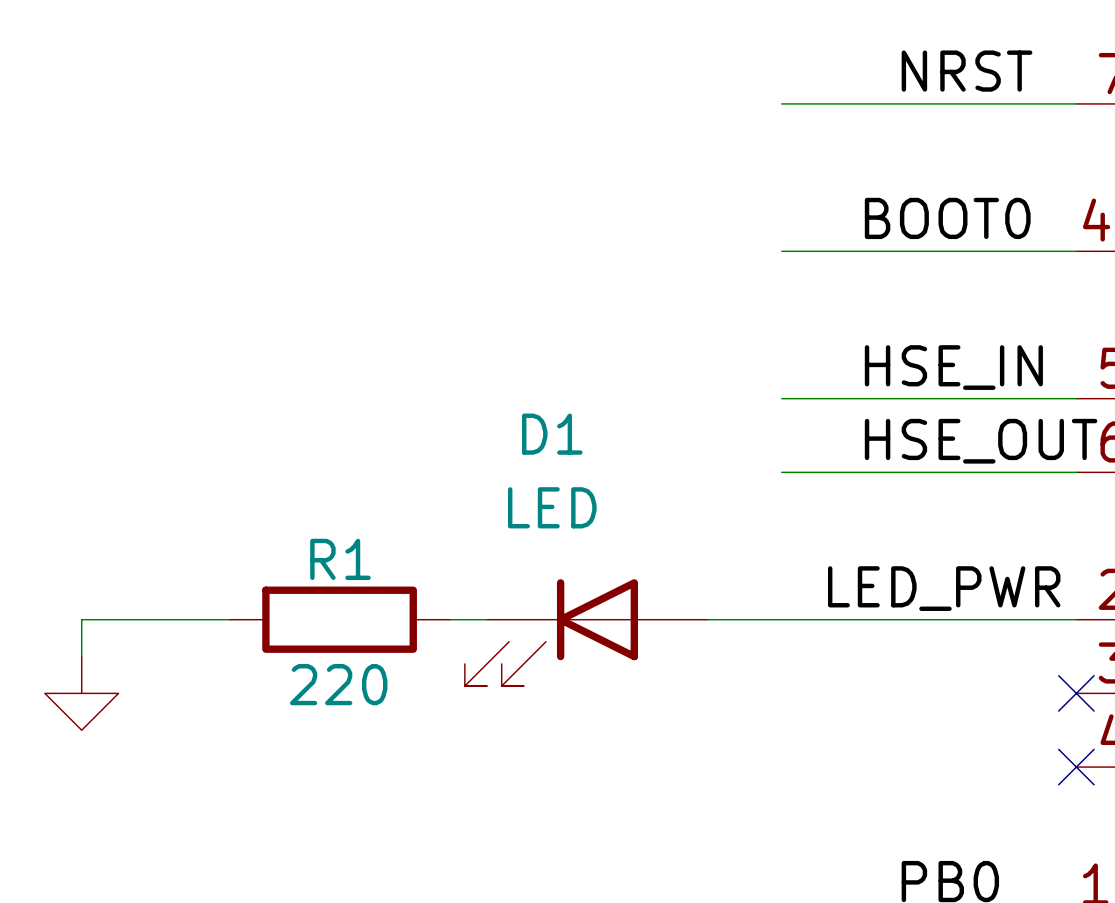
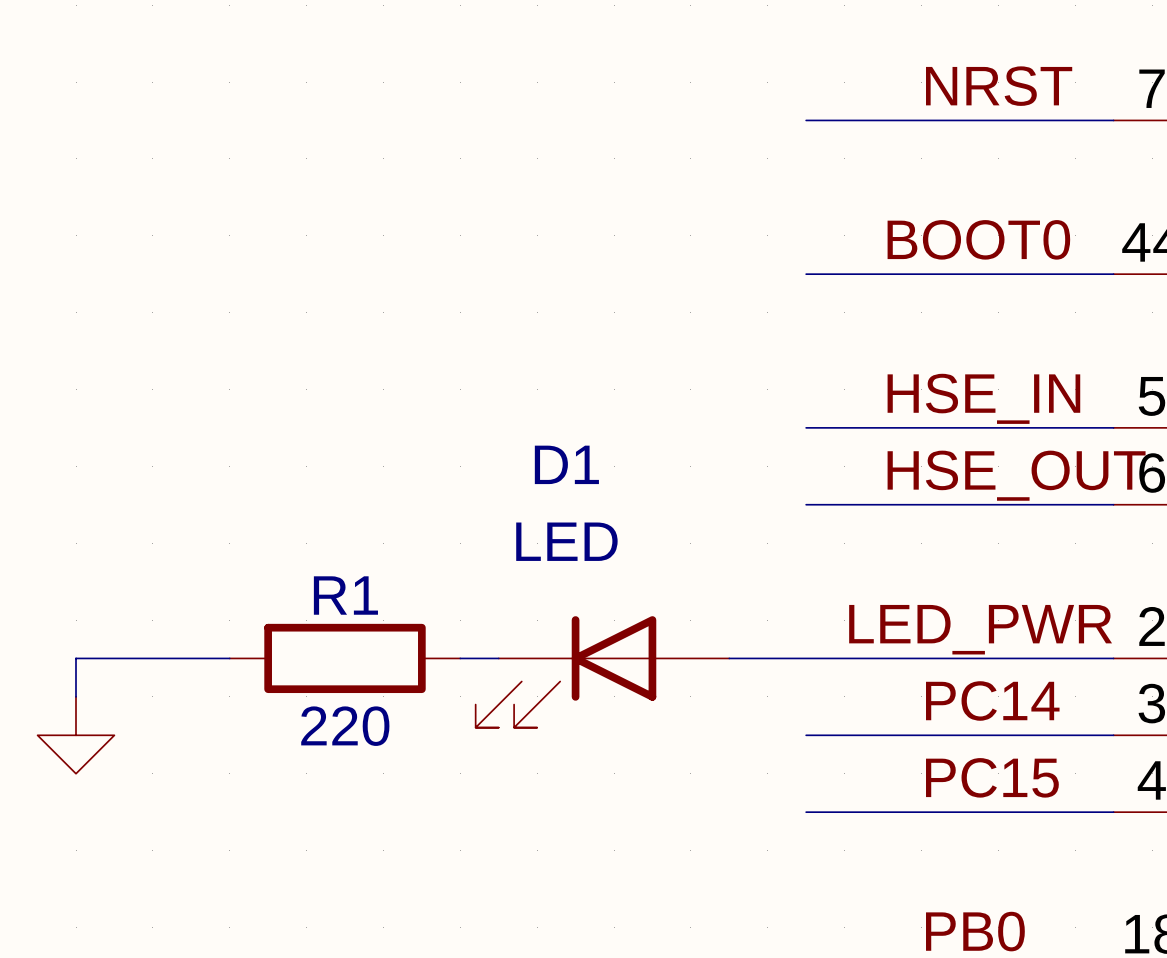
label: none -> PC14 (992, 700)
wire: none -> (806, 735) (1113, 735)
no-connect mark: (1076, 693) -> none
label: none -> PC15 (992, 777)
wire: none -> (806, 812) (1113, 812)
no-connect mark: (1076, 767) -> none

